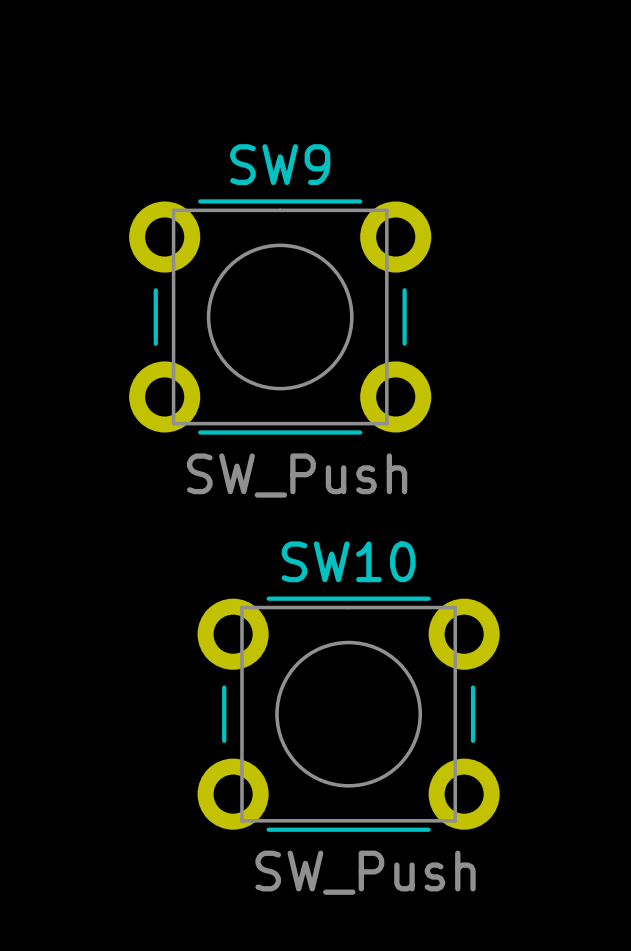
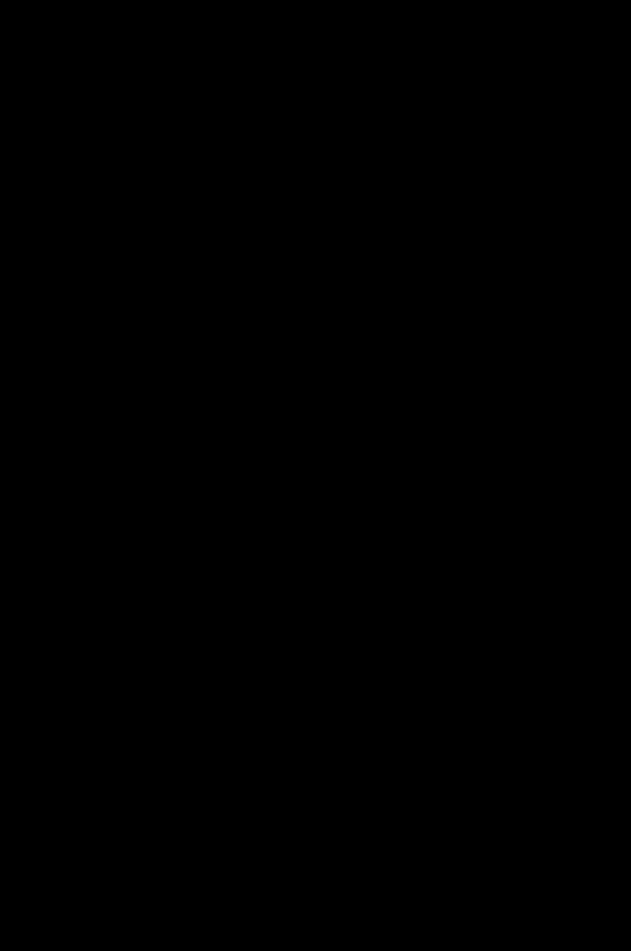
SW9: SW_Push (280, 316) -> none
SW10: SW_Push (348, 714) -> none

